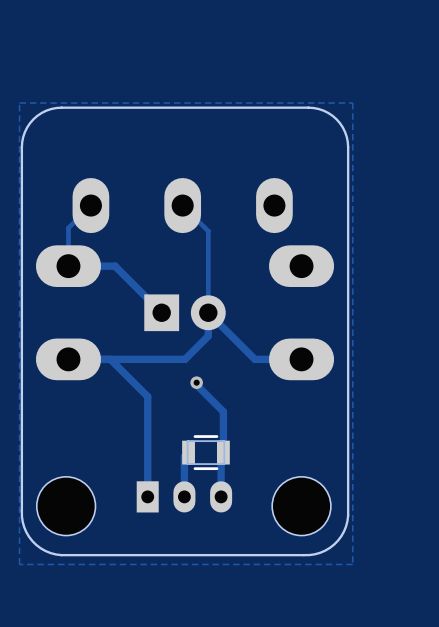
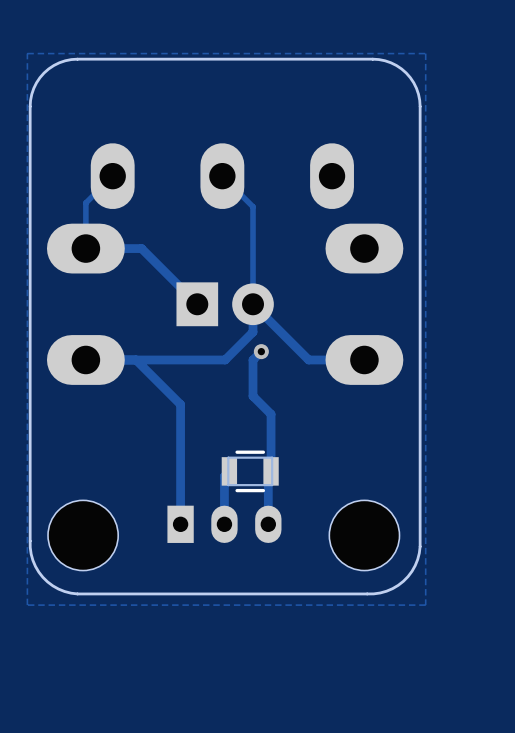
track: (196, 382) (196, 385) (223, 411) -> (261, 351) (253, 359) (253, 396) (271, 414) (271, 422)
via position: (196, 382) -> (261, 351)

